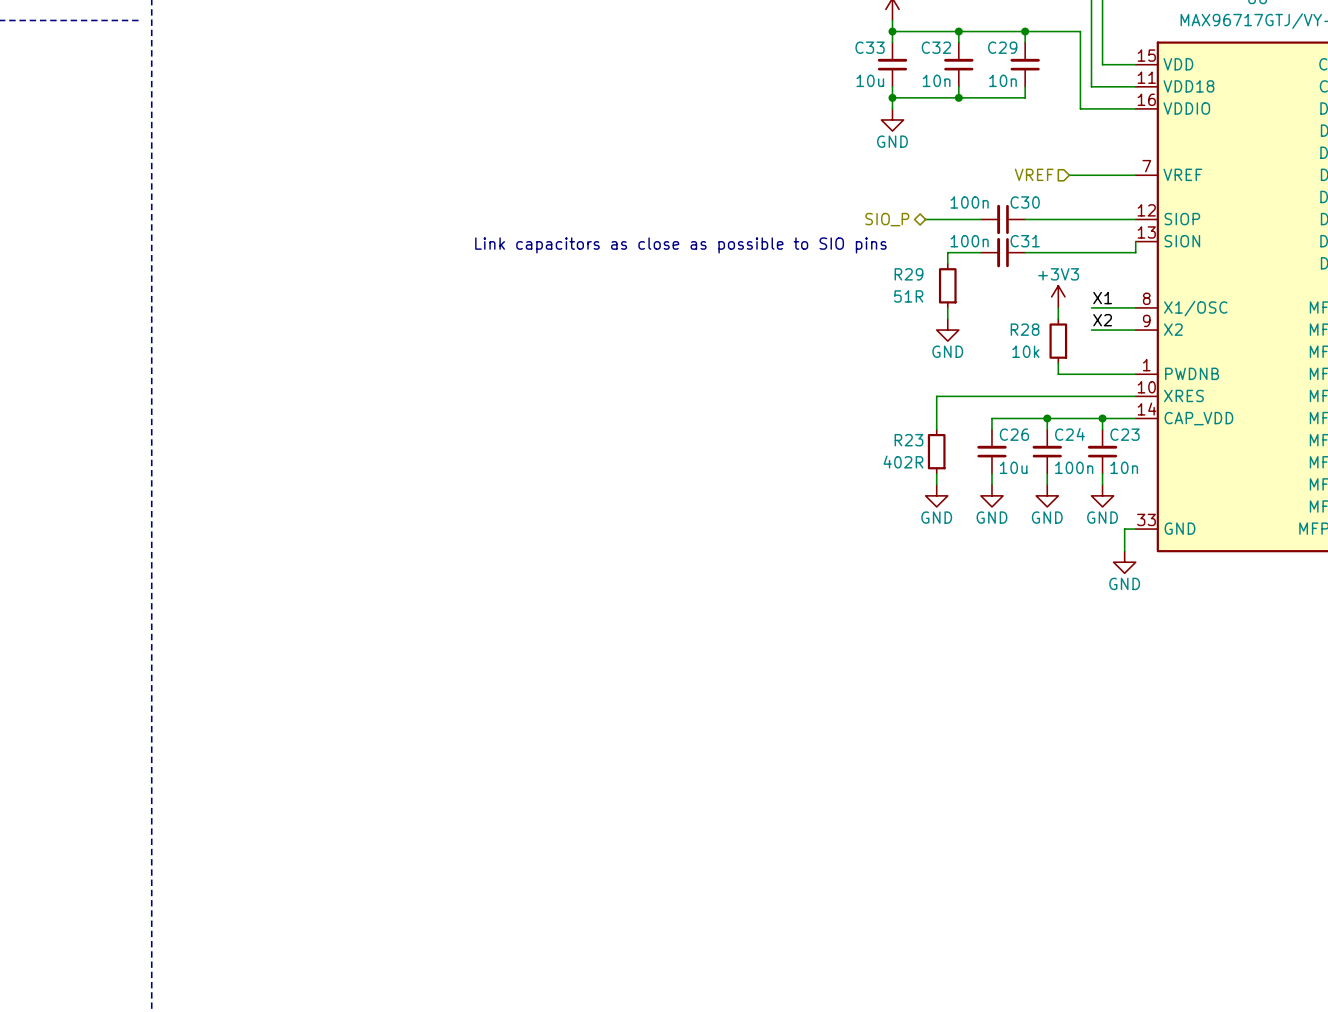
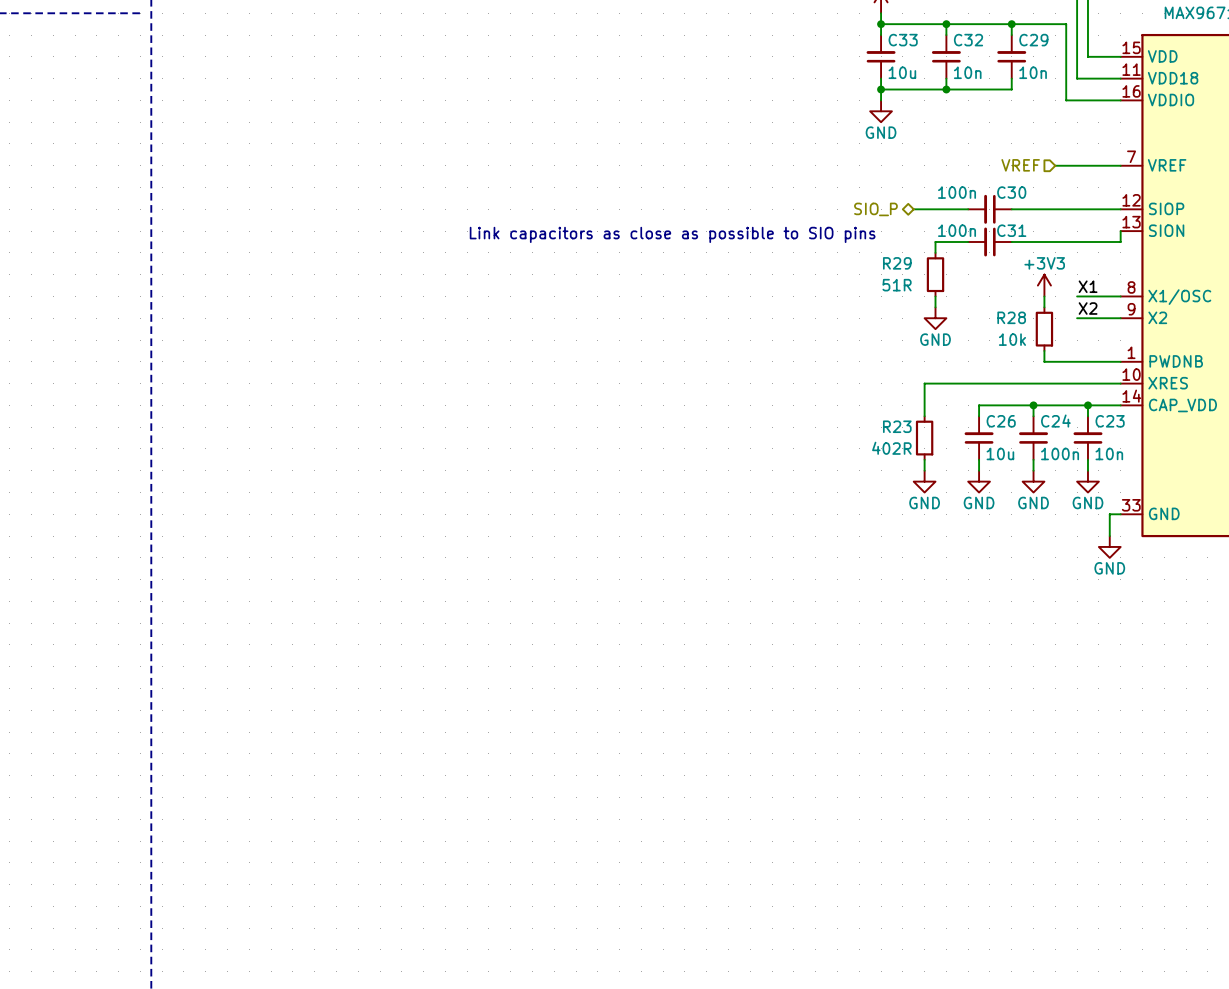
C33 name position: C33 (870, 47) -> C33 (903, 40)
C32 name position: C32 (936, 47) -> C32 (968, 40)
C29 name position: C29 (1002, 47) -> C29 (1033, 40)
C33 text position: 10u (870, 80) -> 10u (902, 72)
C32 text position: 10n (936, 80) -> 10n (967, 72)
C29 text position: 10n (1002, 80) -> 10n (1033, 72)

